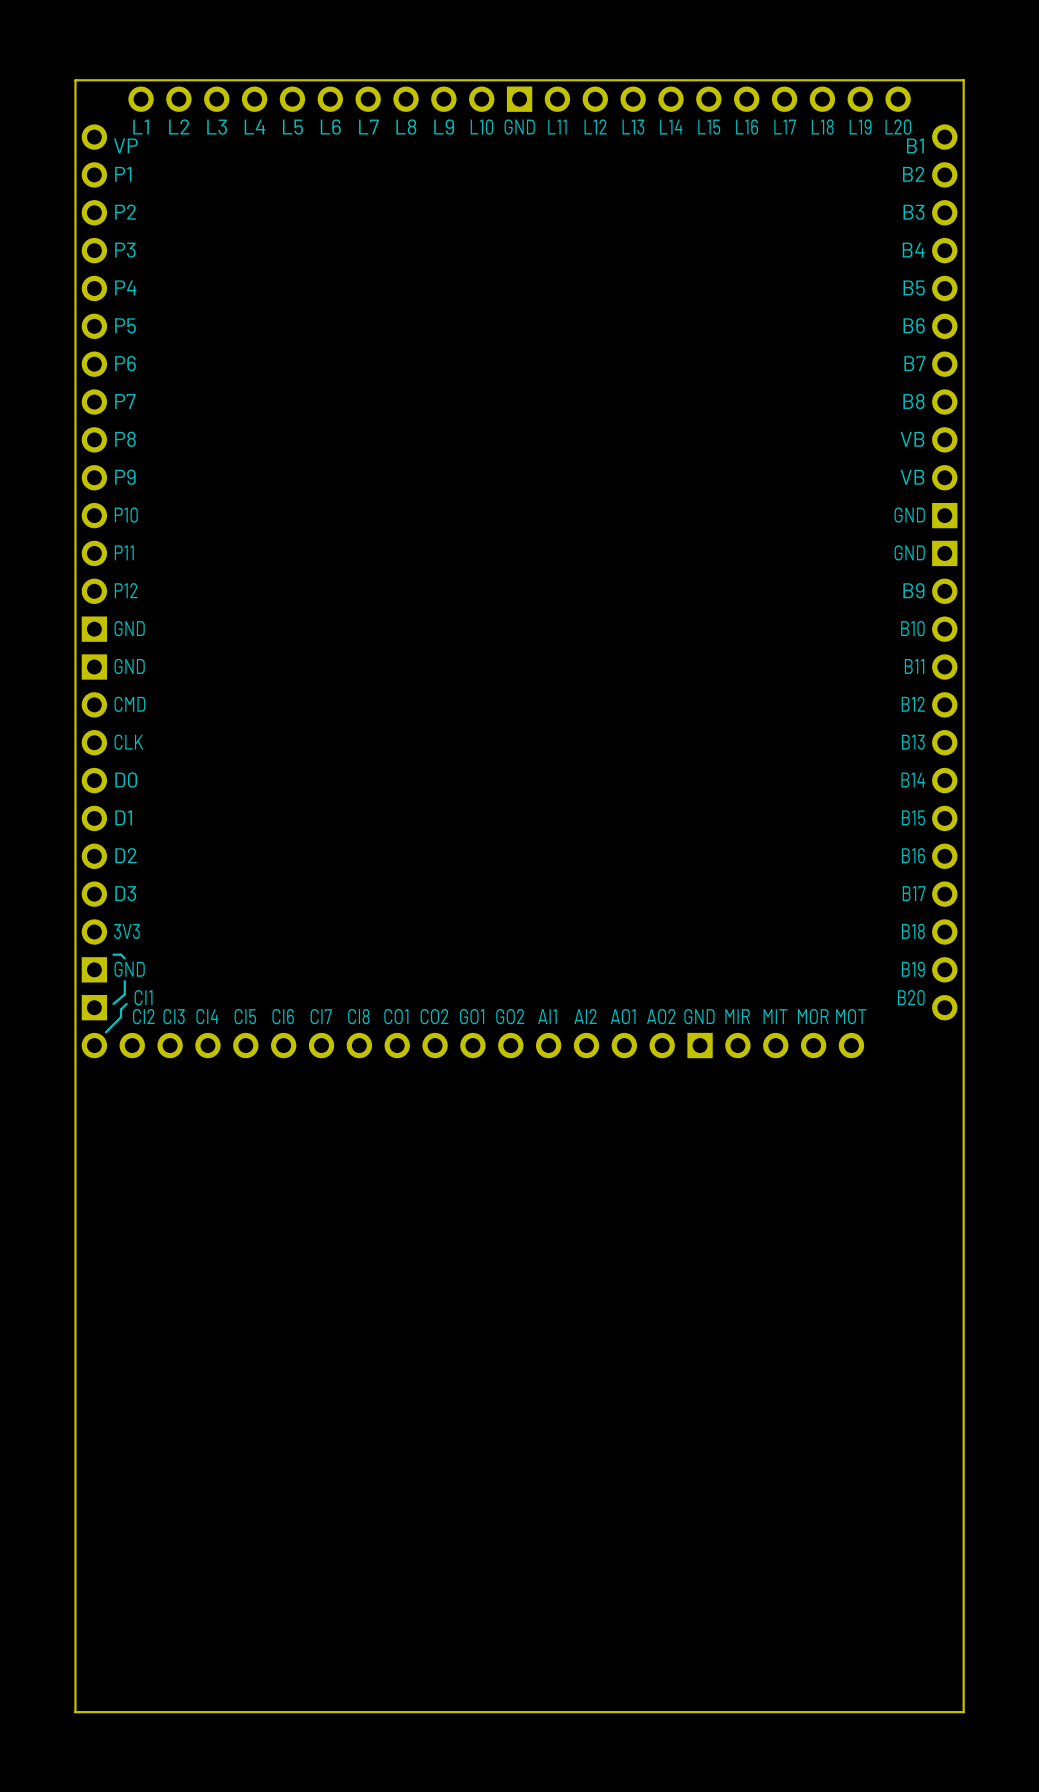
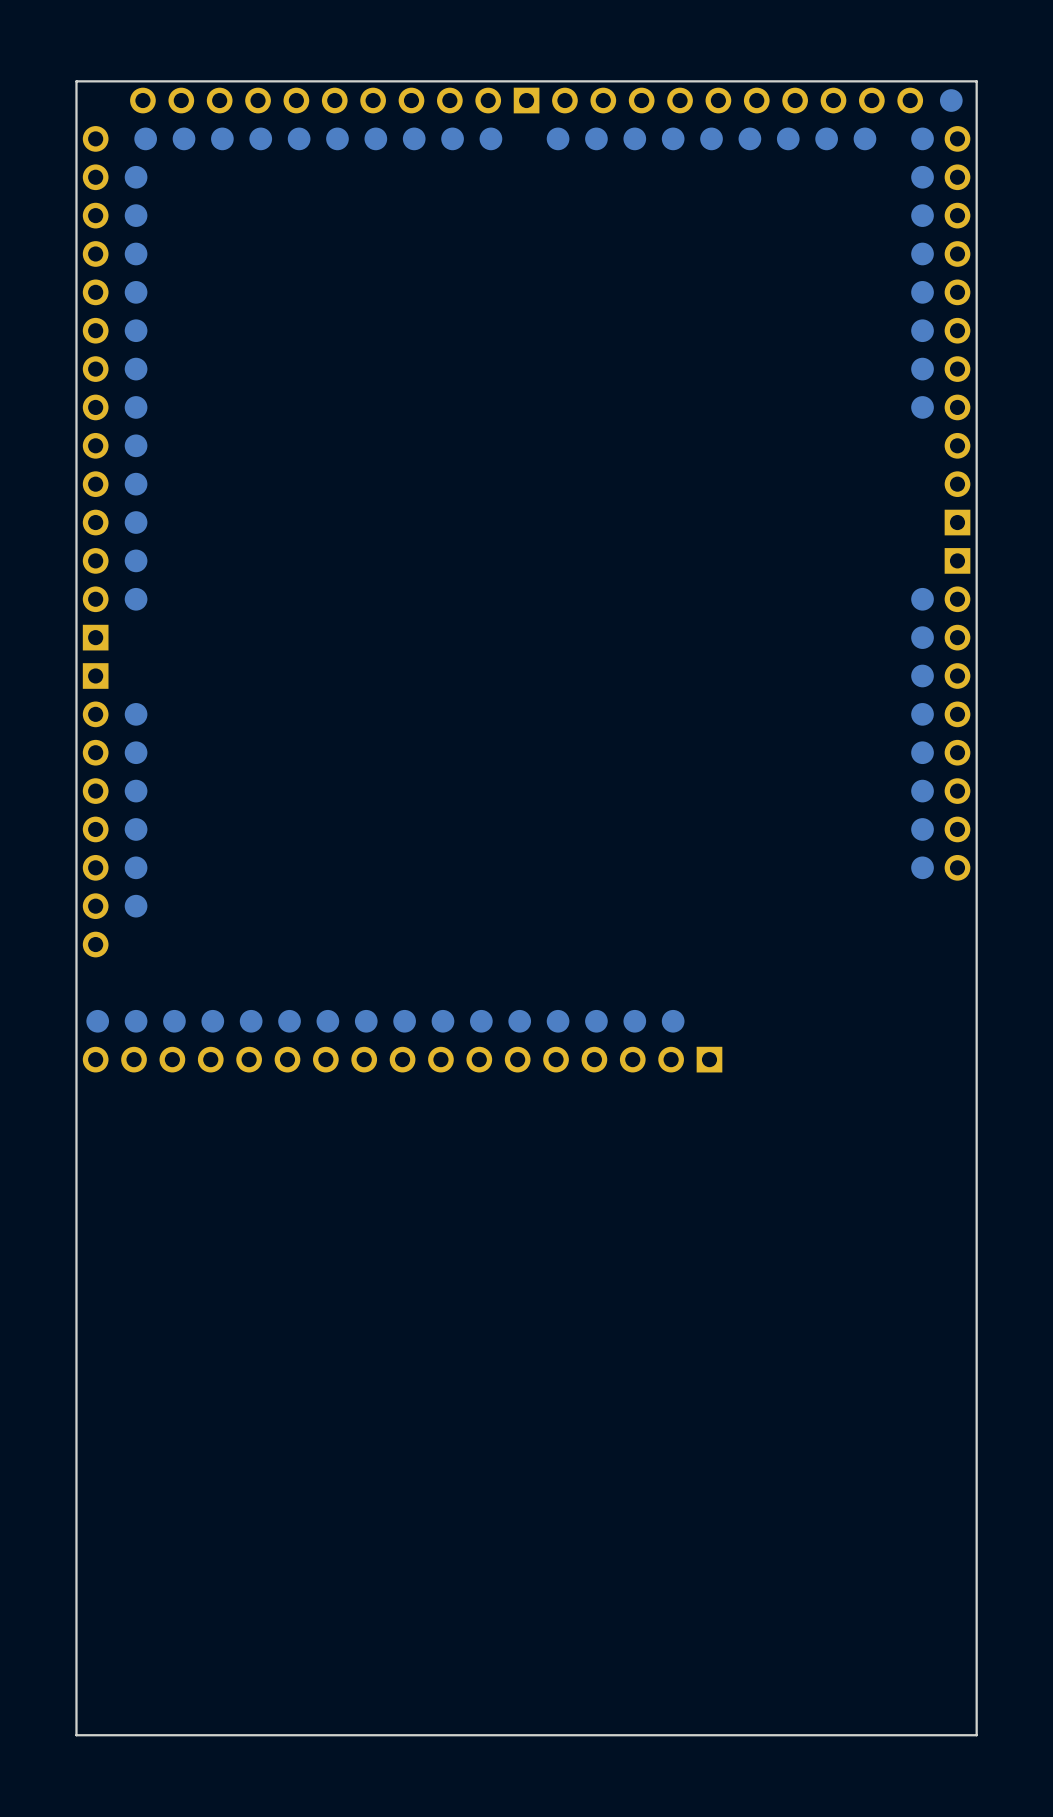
part: none -> (951, 100)
text: L2 (179, 126) -> none
text: L12 (595, 126) -> none
text: L1 (141, 127) -> none
text: L3 (217, 127) -> none
text: L4 (254, 127) -> none
text: L5 (292, 127) -> none
text: L6 (330, 127) -> none
text: L7 (368, 127) -> none
text: L8 (406, 127) -> none
text: L9 (444, 127) -> none
text: L10 (481, 127) -> none
text: GND (519, 127) -> none
text: L11 (557, 127) -> none
text: L13 (633, 127) -> none
text: L14 (671, 127) -> none
text: L15 (709, 127) -> none
text: L16 (747, 127) -> none
text: L17 (785, 127) -> none
text: L18 (822, 127) -> none
text: L19 (860, 127) -> none
text: L20 (898, 127) -> none
part: none -> (145, 138)
part: none -> (184, 138)
part: none -> (222, 138)
part: none -> (260, 138)
part: none -> (299, 138)
part: none -> (337, 138)
part: none -> (375, 138)
part: none -> (414, 138)
part: none -> (452, 138)
part: none -> (490, 138)
part: none -> (558, 138)
part: none -> (596, 138)
part: none -> (634, 138)
part: none -> (673, 138)
part: none -> (711, 138)
part: none -> (749, 138)
part: none -> (788, 138)
part: none -> (826, 138)
part: none -> (864, 138)
part: none -> (922, 138)
text: VP (125, 145) -> none
text: B1 (915, 145) -> none
text: P1 (123, 174) -> none
part: none -> (136, 177)
part: none -> (922, 177)
text: B2 (913, 174) -> none
text: P2 (125, 212) -> none
part: none -> (136, 215)
part: none -> (922, 215)
text: B3 (913, 212) -> none
text: P3 (125, 250) -> none
part: none -> (136, 253)
part: none -> (922, 253)
text: B4 (913, 250) -> none
text: P4 (125, 287) -> none
text: B5 (914, 287) -> none
part: none -> (136, 292)
part: none -> (922, 292)
text: P5 (125, 325) -> none
text: B6 (914, 325) -> none
part: none -> (136, 330)
part: none -> (922, 330)
text: P6 (125, 363) -> none
text: B7 (914, 363) -> none
part: none -> (136, 369)
part: none -> (922, 369)
text: P7 (125, 401) -> none
text: B8 (913, 401) -> none
part: none -> (136, 407)
part: none -> (922, 407)
text: P8 (125, 439) -> none
part: none -> (136, 445)
text: VB (912, 439) -> none
text: P9 (125, 477) -> none
part: none -> (136, 484)
text: VB (912, 477) -> none
text: P10 (126, 515) -> none
part: none -> (136, 522)
text: GND (909, 515) -> none
text: P11 (124, 552) -> none
text: GND (909, 552) -> none
part: none -> (136, 560)
part: (94, 572) -> none
part: (944, 572) -> none
text: P12 (126, 590) -> none
text: B9 (913, 590) -> none
part: none -> (136, 599)
part: none -> (922, 599)
text: GND (129, 628) -> none
text: B10 (912, 628) -> none
part: none -> (922, 637)
text: GND (129, 666) -> none
text: B11 (914, 666) -> none
part: none -> (922, 675)
text: CMD (129, 704) -> none
part: none -> (136, 714)
part: none -> (922, 714)
text: B12 (913, 704) -> none
text: CLK (128, 742) -> none
part: none -> (136, 752)
part: none -> (922, 752)
text: B13 (913, 742) -> none
text: D0 (126, 780) -> none
part: none -> (136, 791)
part: none -> (922, 791)
text: B14 (913, 780) -> none
text: D1 (123, 817) -> none
text: B15 (913, 817) -> none
part: none -> (136, 829)
part: none -> (922, 829)
text: D2 (125, 855) -> none
text: B16 (913, 855) -> none
part: none -> (136, 867)
part: none -> (922, 867)
text: D3 (125, 893) -> none
text: B17 (914, 893) -> none
part: none -> (136, 906)
text: 3V3 (126, 931) -> none
text: B18 (913, 931) -> none
line: (113, 954) (121, 954) (124, 958) -> none
text: GND (129, 969) -> none
text: B19 (913, 969) -> none
line: (124, 981) (124, 994) (113, 1003) -> none
text: CI1 (143, 997) -> none
text: B20 (911, 997) -> none
line: (126, 1003) (121, 1009) (121, 1017) (105, 1032) -> none
part: none -> (97, 1021)
part: none -> (136, 1021)
part: none -> (174, 1021)
part: none -> (212, 1021)
part: none -> (251, 1021)
part: none -> (289, 1021)
part: none -> (327, 1021)
part: none -> (366, 1021)
part: none -> (404, 1021)
part: none -> (442, 1021)
part: none -> (481, 1021)
part: none -> (519, 1021)
part: none -> (558, 1021)
part: none -> (596, 1021)
part: none -> (634, 1021)
part: none -> (673, 1021)
text: CI2 (143, 1016) -> none
text: CI3 (174, 1016) -> none
text: CI4 (207, 1016) -> none
text: CI5 (245, 1016) -> none
text: CI6 (283, 1016) -> none
text: CI7 (321, 1016) -> none
text: CI8 (358, 1016) -> none
text: CO1 (396, 1016) -> none
text: CO2 (434, 1016) -> none
text: GO1 (472, 1016) -> none
text: GO2 (510, 1016) -> none
text: AI1 (547, 1016) -> none
text: AI2 (585, 1016) -> none
text: AO1 (623, 1016) -> none
text: AO2 (661, 1016) -> none
text: GND (699, 1016) -> none
text: MIR (737, 1016) -> none
text: MIT (775, 1016) -> none
text: MOR (813, 1016) -> none
text: MOT (851, 1016) -> none
part: (472, 1045) -> none

